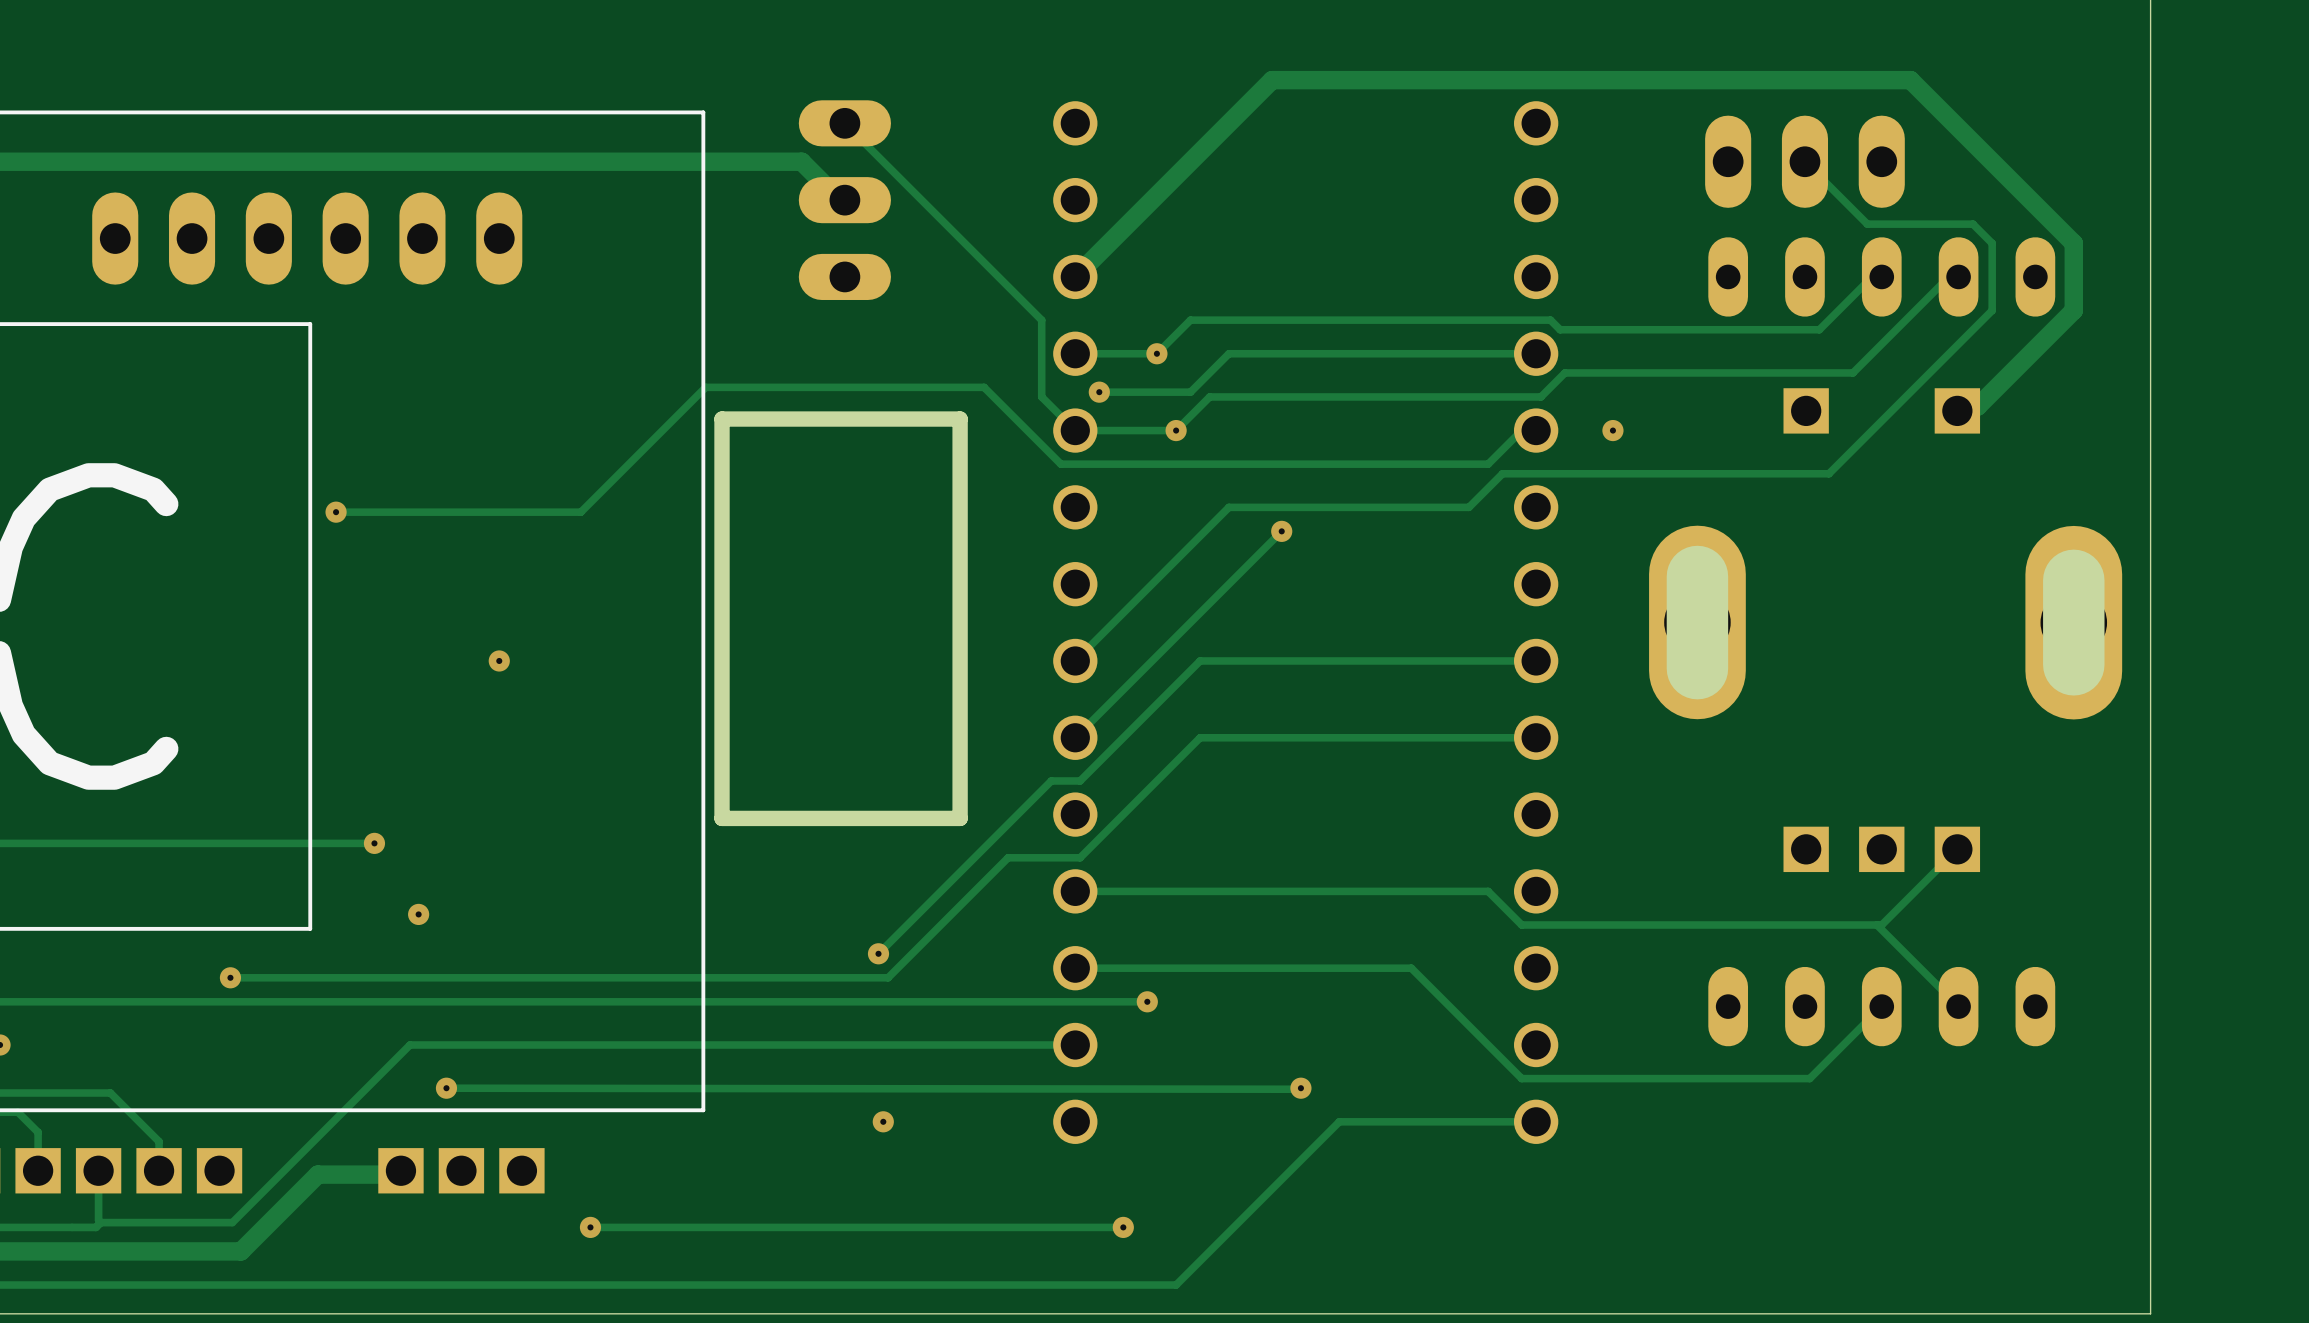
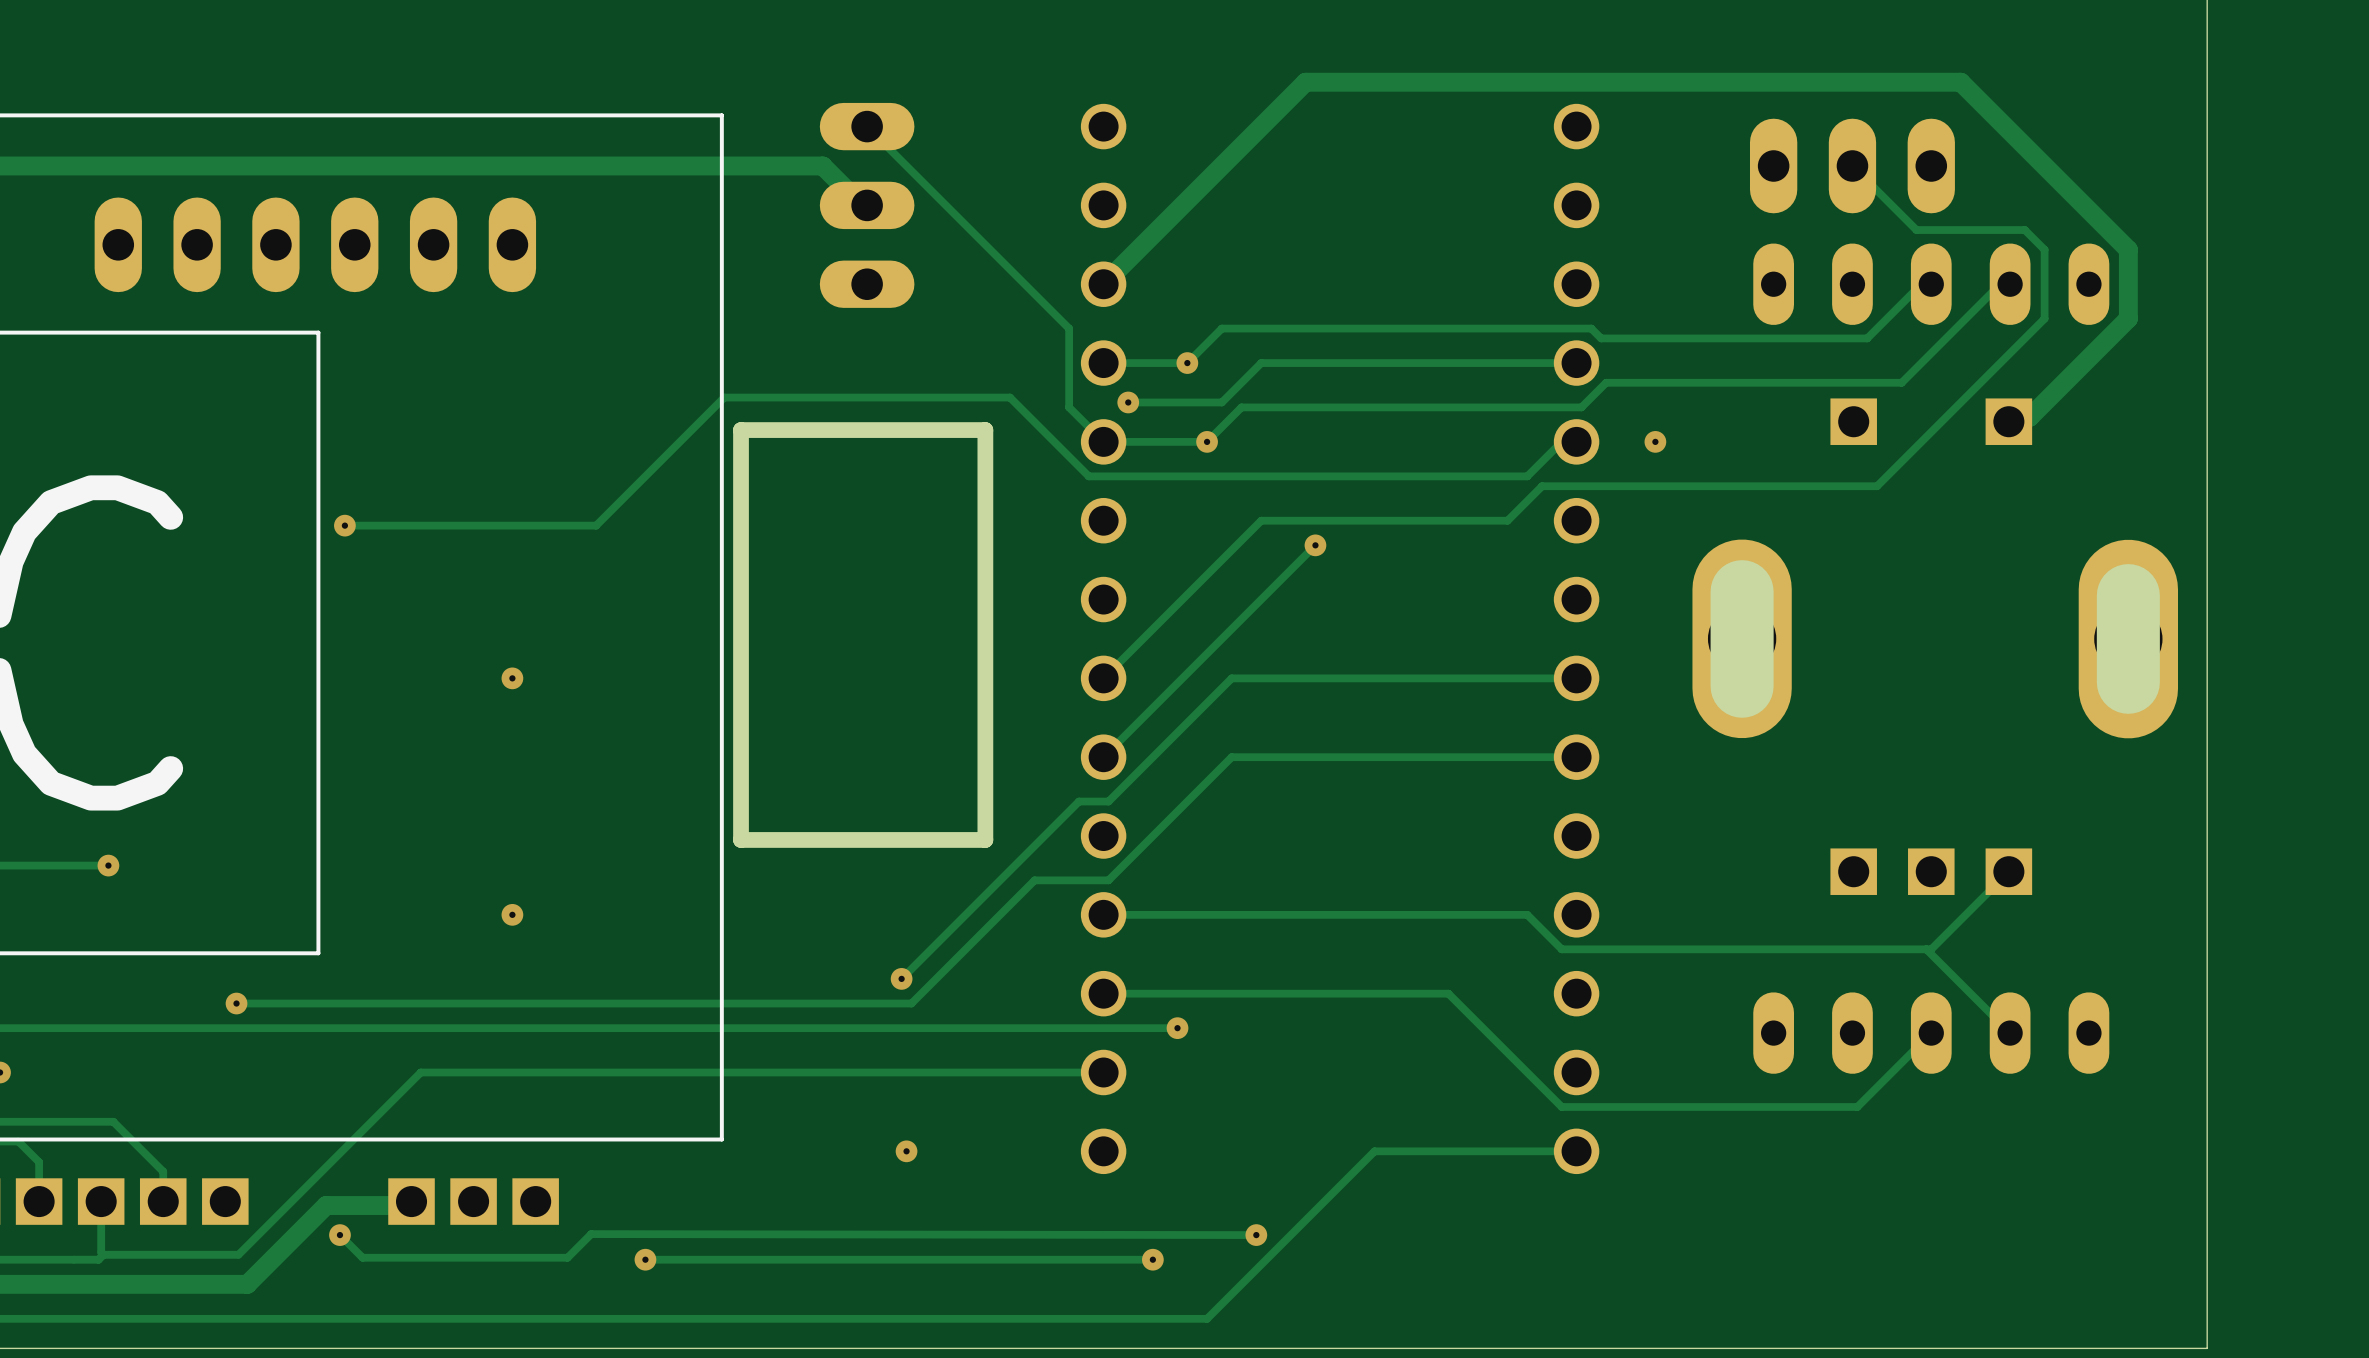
via: none -> (108, 865)
track: (374, 843) (105, 843) -> none
via: (374, 843) -> none
via: none -> (512, 914)
via: (418, 914) -> none
via: (446, 1088) -> none
track: (1300, 1088) (446, 1088) -> none
via position: (1300, 1088) -> (1256, 1235)
via: none -> (339, 1235)
track: none -> (1256, 1235) (591, 1234) (567, 1257) (362, 1257) (339, 1235)
via position: (590, 1227) -> (645, 1259)
track: (628, 1227) (590, 1227) -> none

